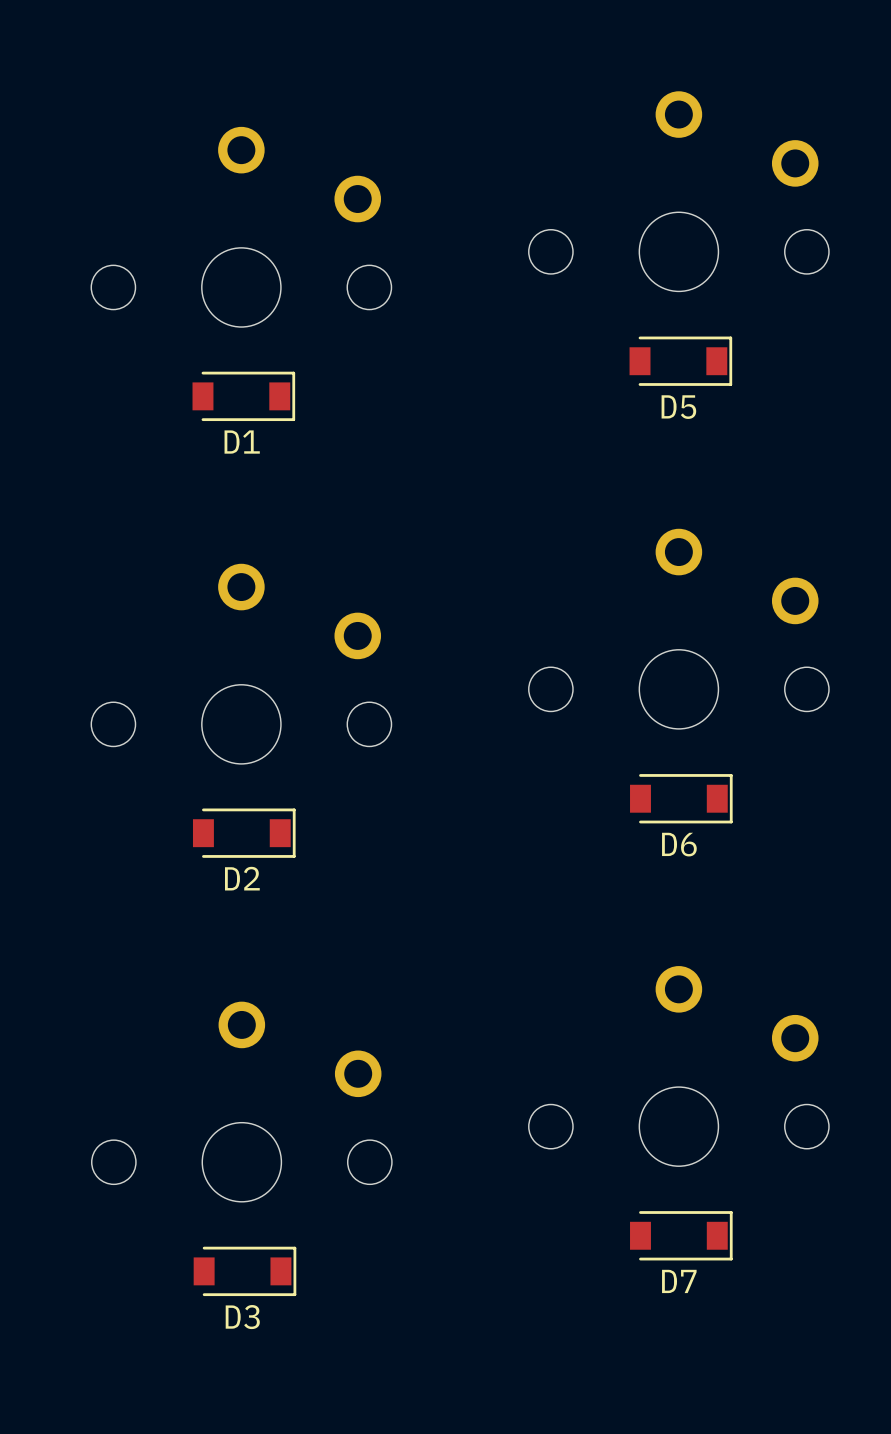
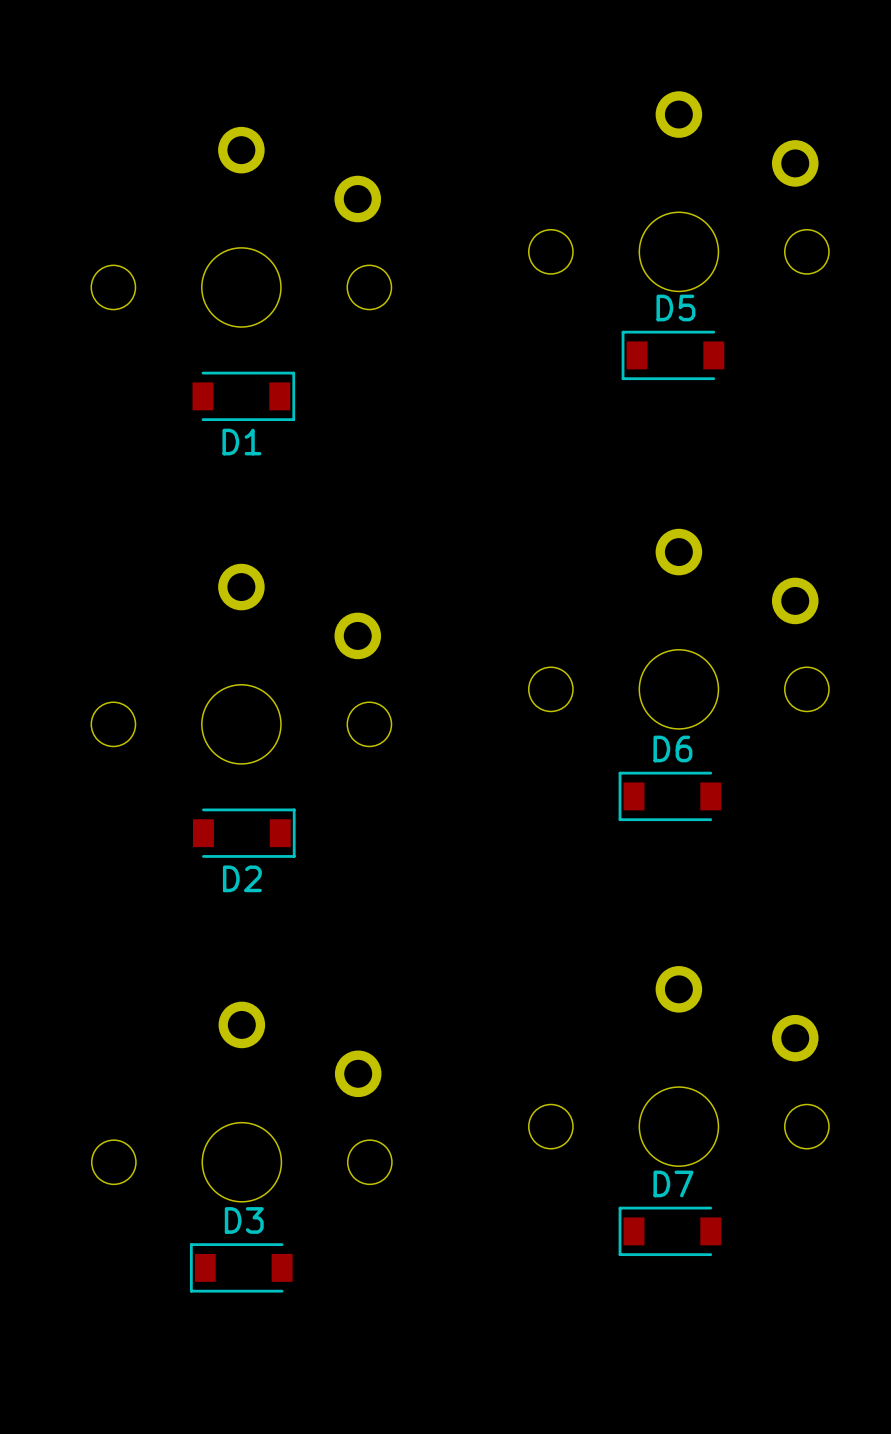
D5 rotation: 0° (680, 361) -> 180° (672, 355)
D6 rotation: 0° (681, 798) -> 180° (669, 796)
D7 rotation: 0° (681, 1235) -> 180° (669, 1231)
D3 rotation: 0° (244, 1271) -> 180° (241, 1267)

